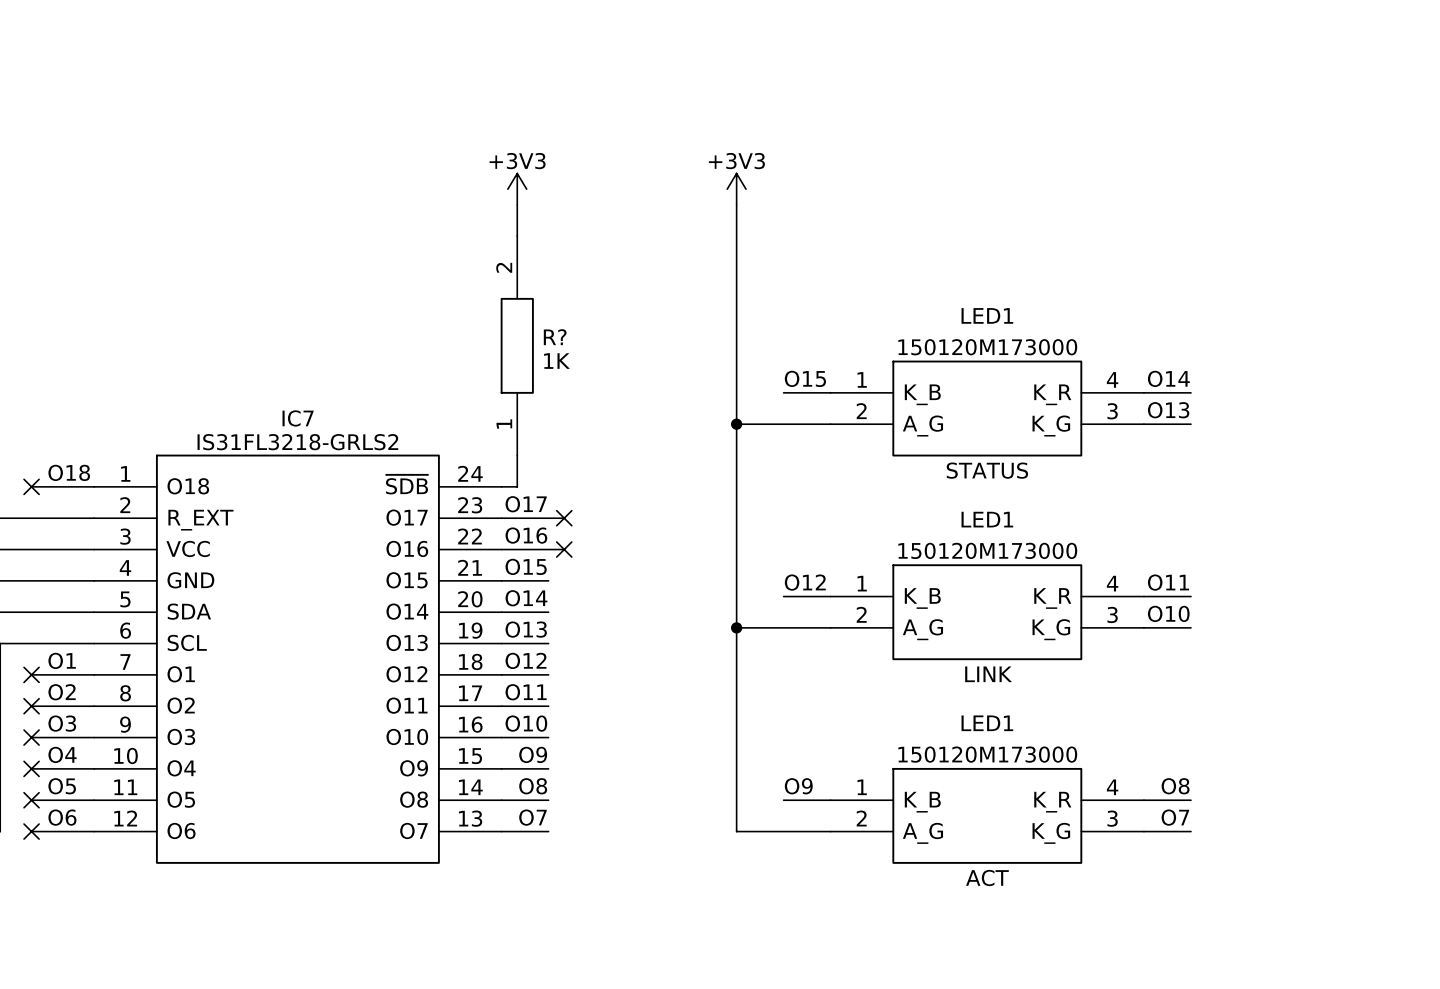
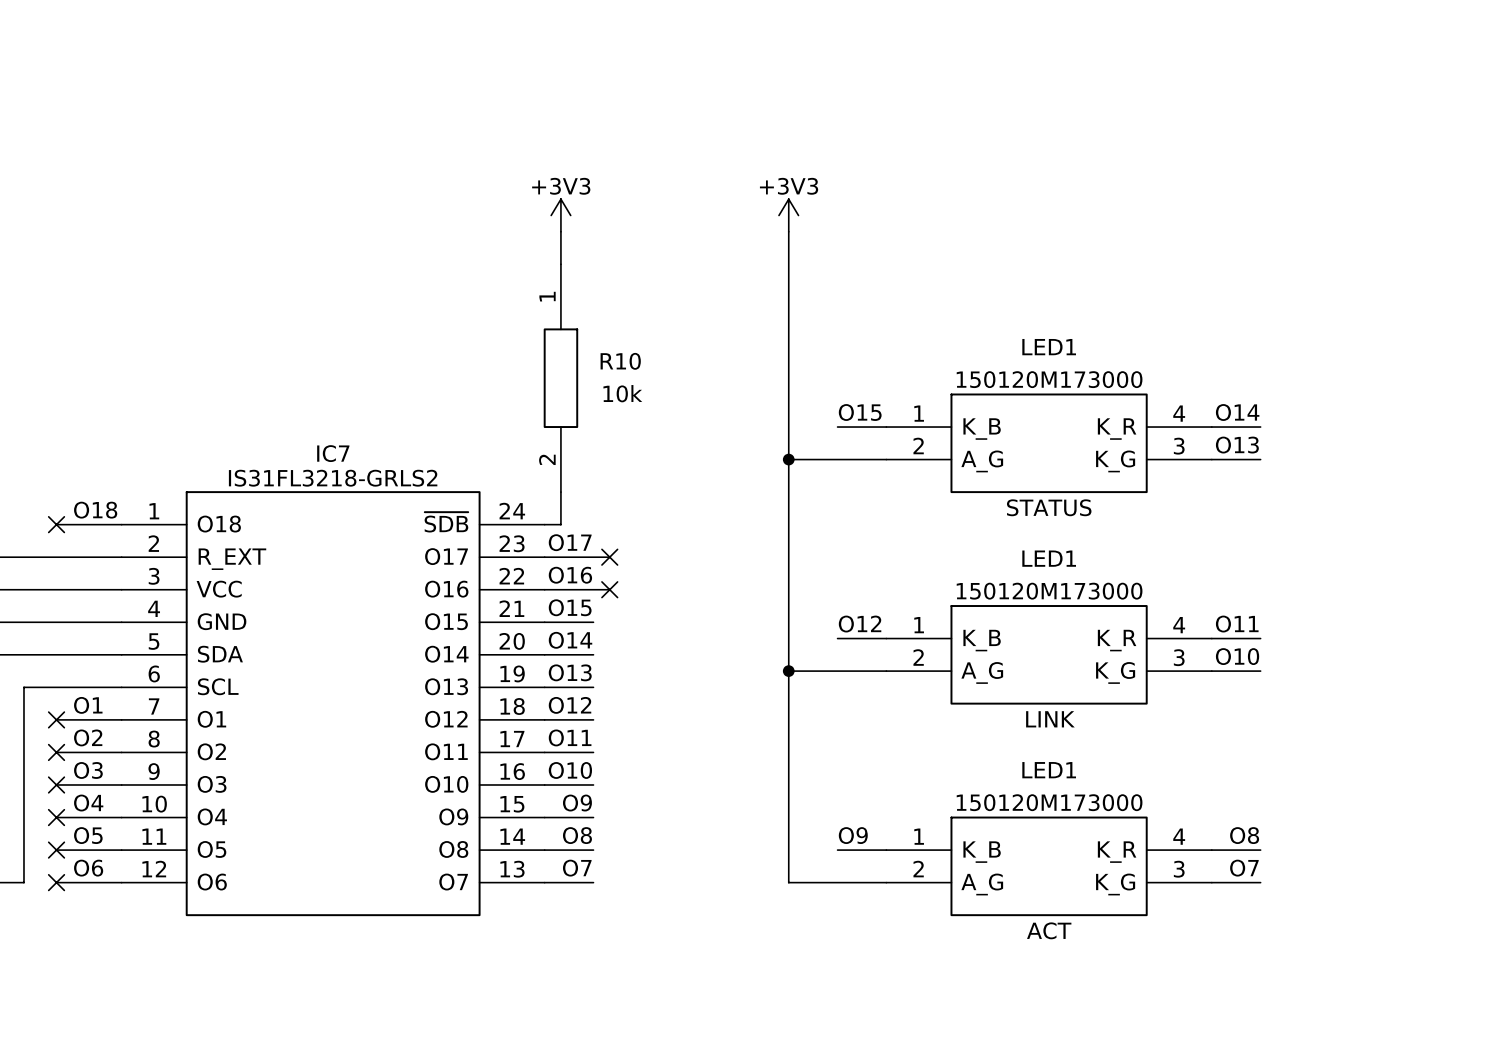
R? name: R? (555, 337) -> R10 (620, 361)
R? rotation: 0° (517, 345) -> 180° (560, 378)
R? value: 1K (557, 361) -> 10k (622, 393)

